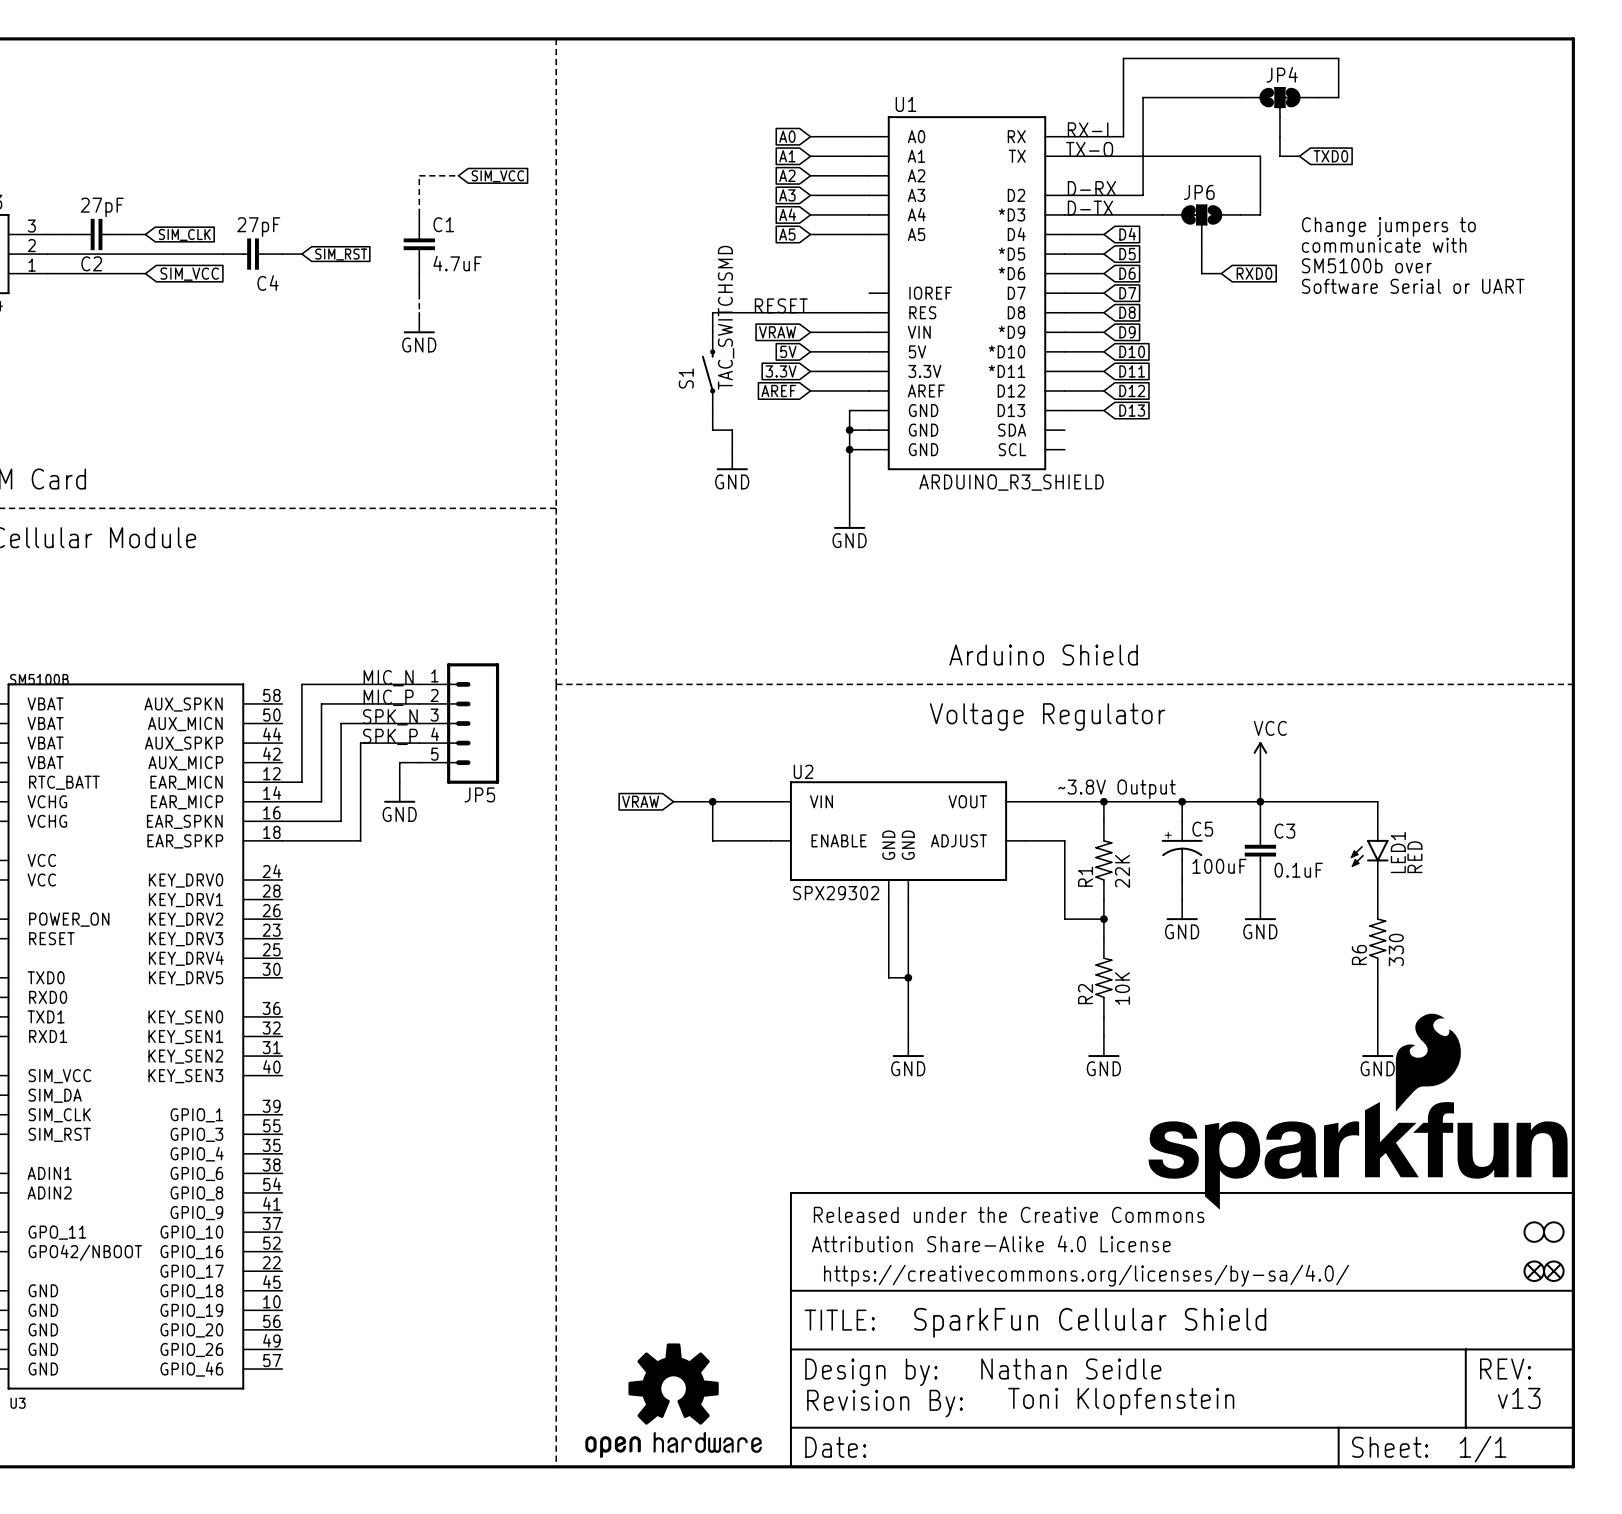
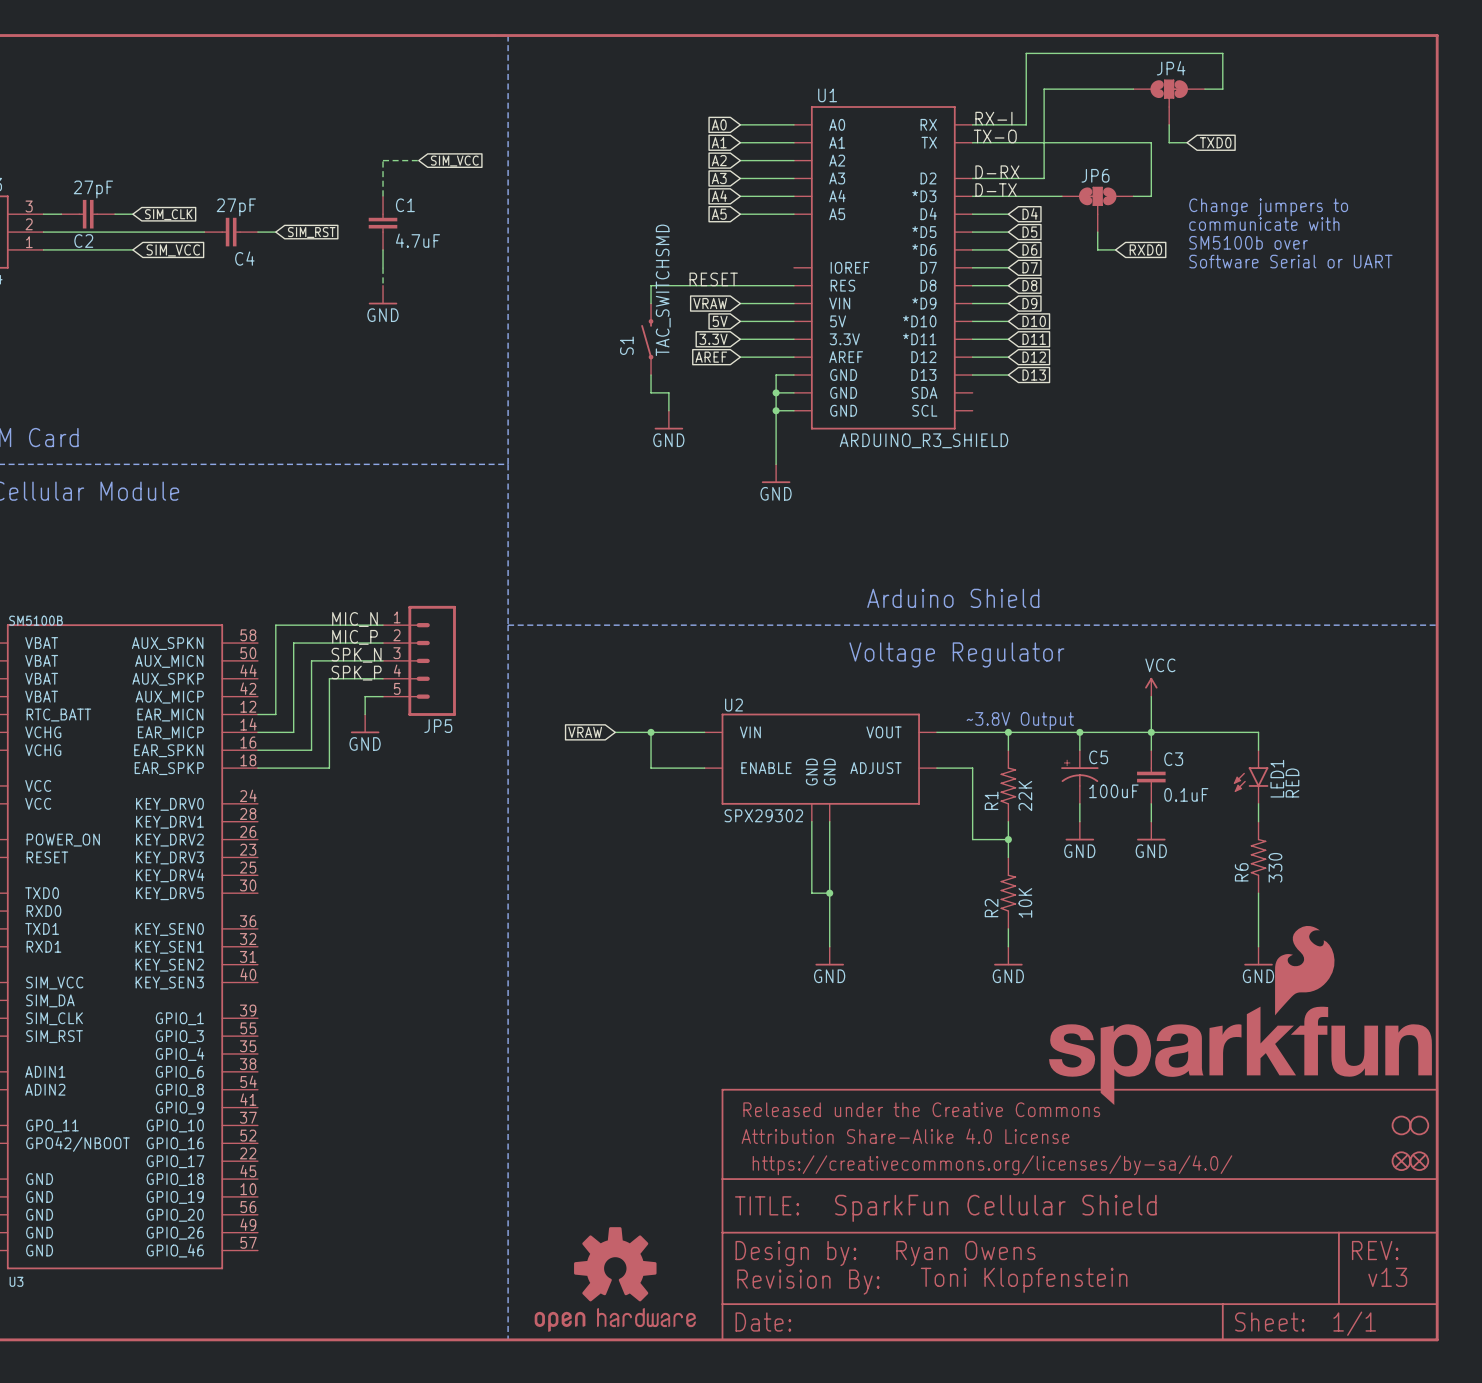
text: Nathan Seidle (1071, 1369) -> Ryan Owens (965, 1253)

